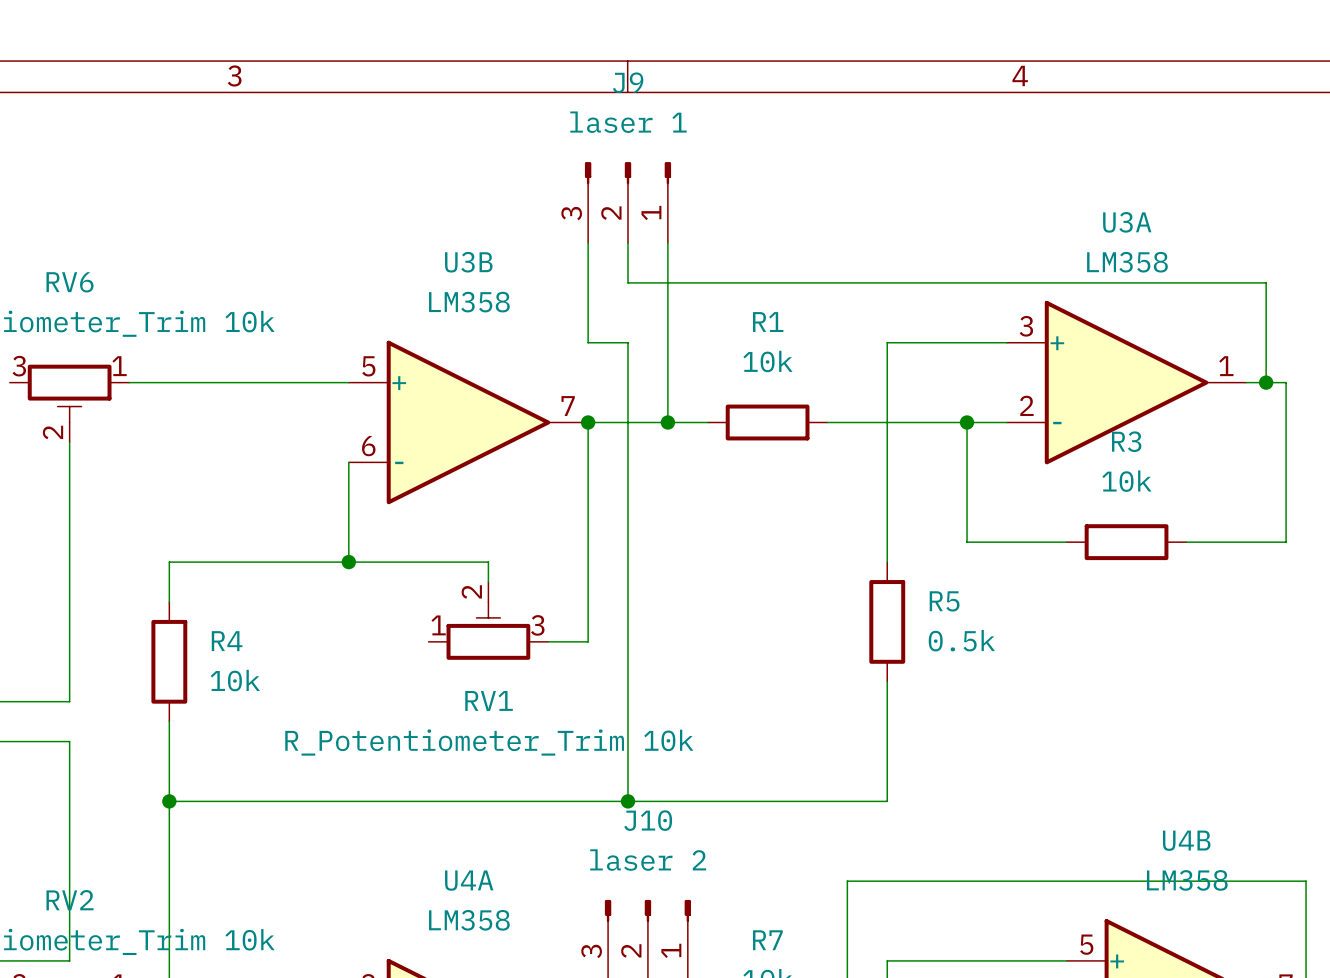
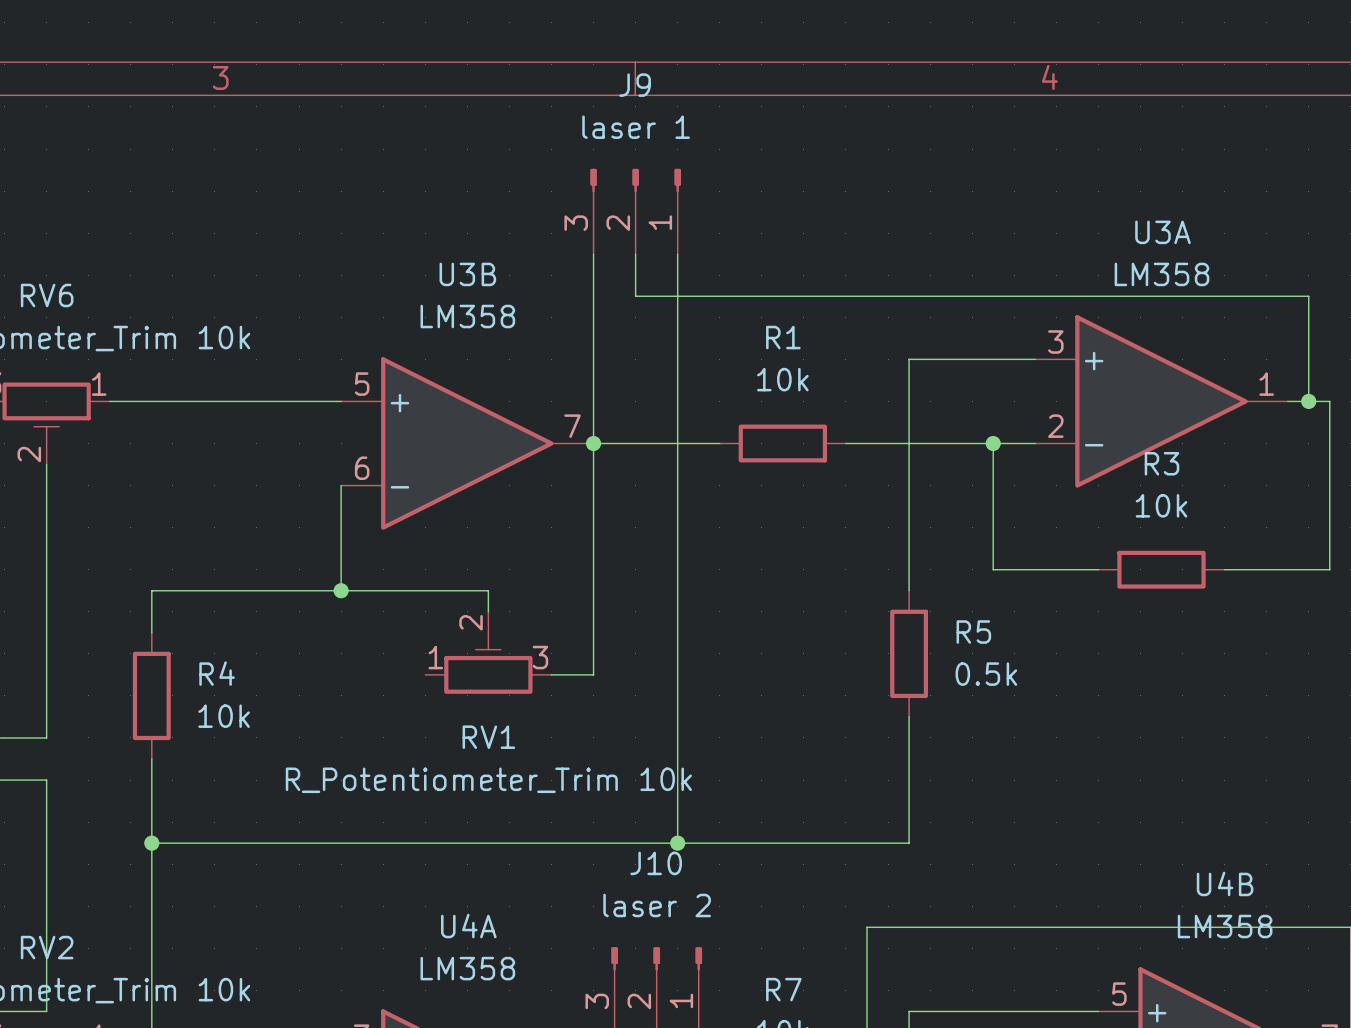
wire: (588, 342) (628, 342) (628, 801) -> (593, 359) (593, 443)
wire: none -> (677, 443) (677, 843)
junction: (667, 422) -> none
junction position: (628, 801) -> (677, 843)

